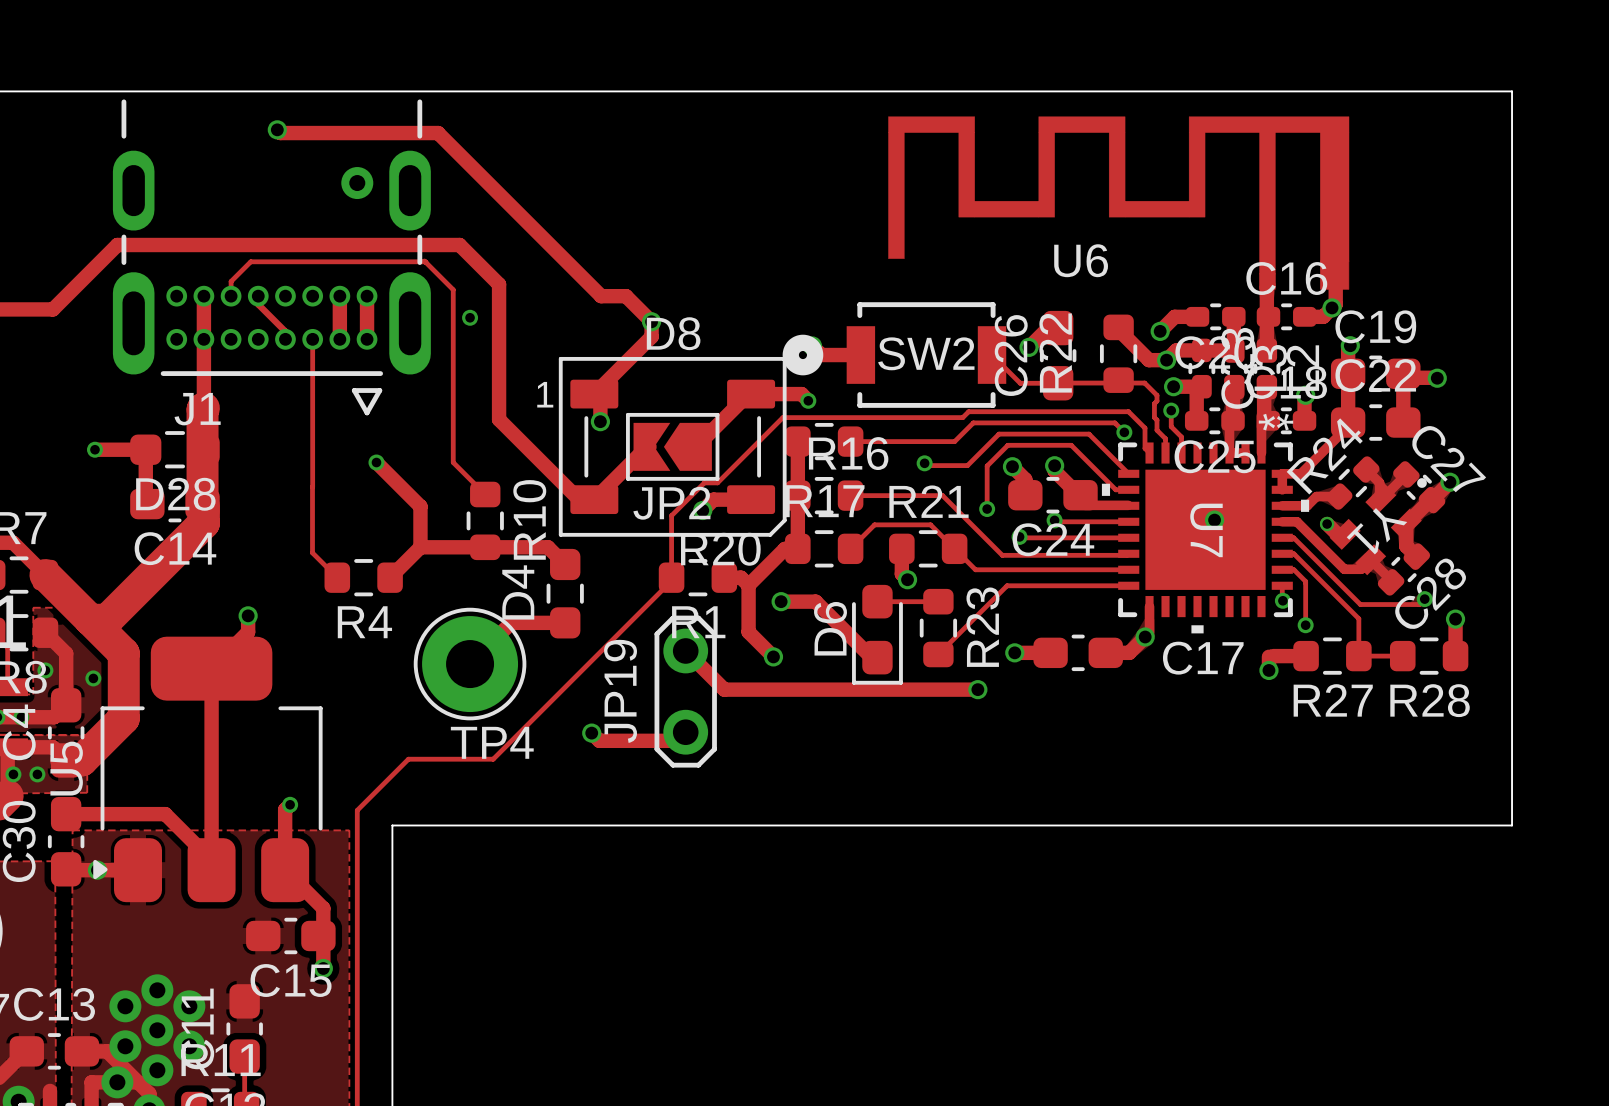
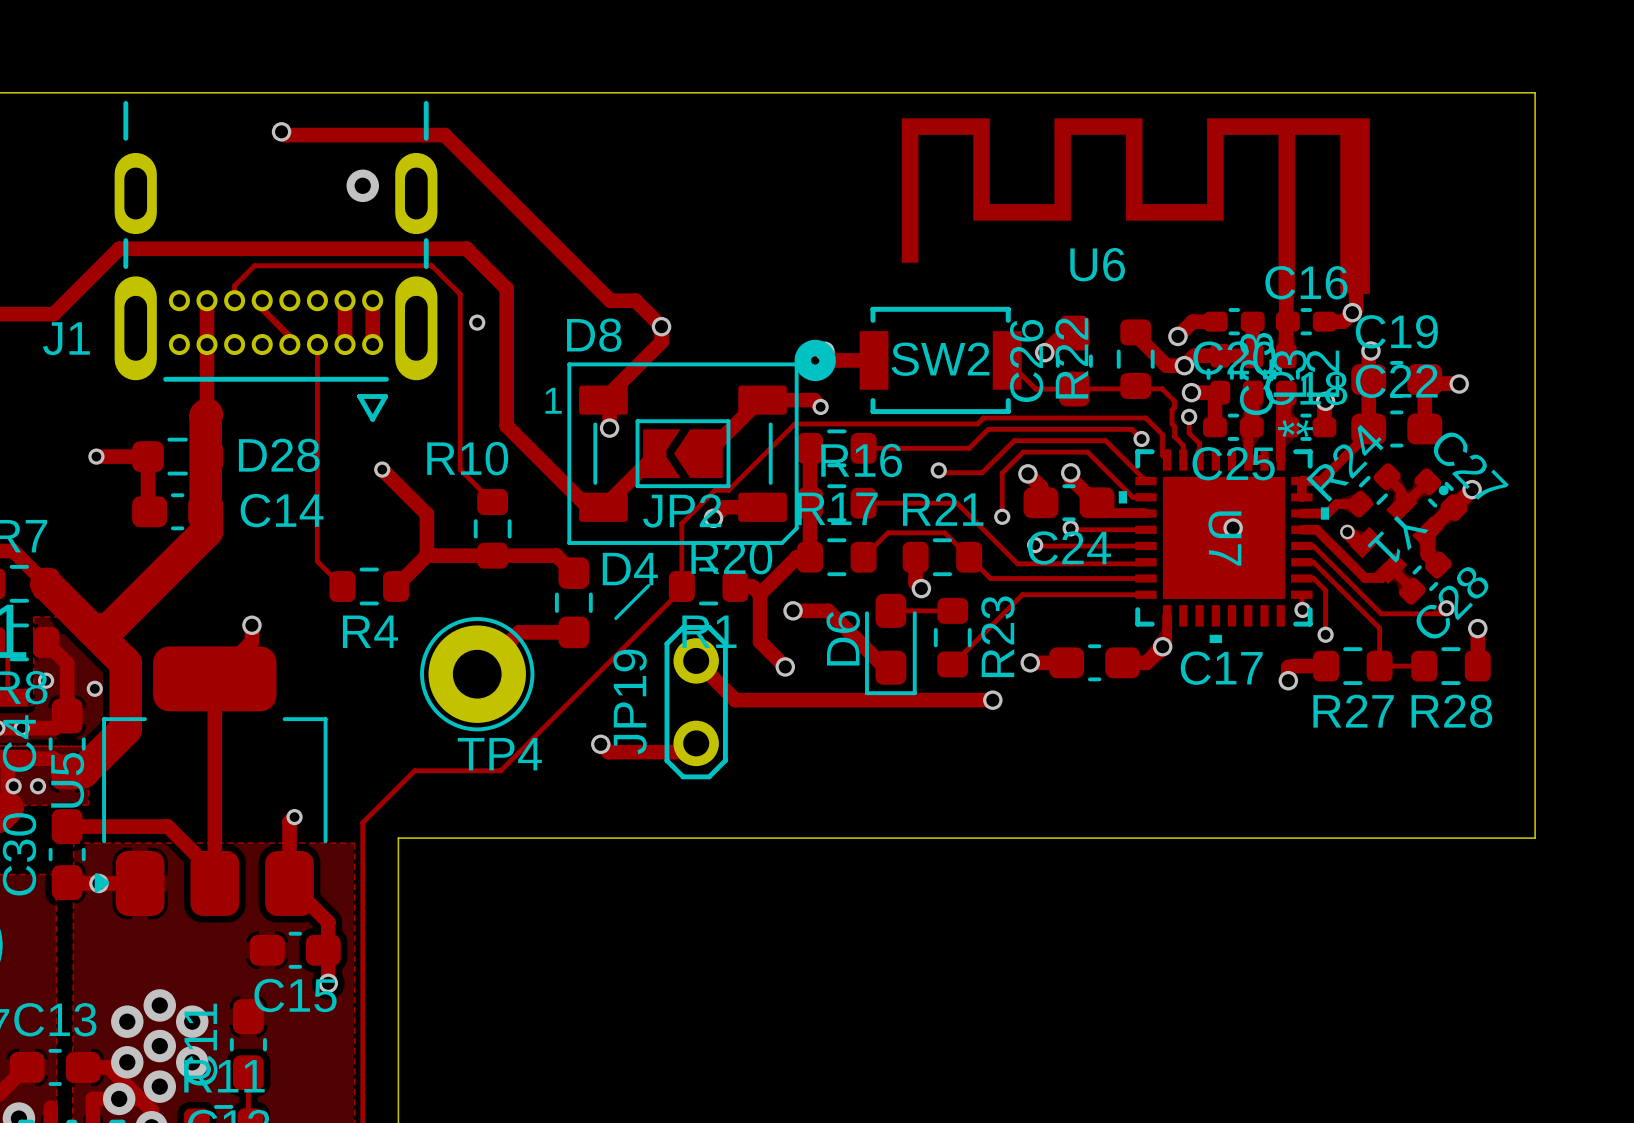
D8 name position: D8 (673, 333) -> D8 (594, 335)
J1 name position: J1 (197, 409) -> J1 (66, 338)
D28 name position: D28 (175, 494) -> D28 (279, 455)
R10 name rotation: 0° (529, 519) -> 90° clockwise (467, 458)
C14 name position: C14 (175, 548) -> C14 (282, 510)
line: none -> (648, 585) (615, 618)
D4 name rotation: 0° (518, 592) -> 90° clockwise (630, 569)
D4 name position: D4 (518, 592) -> D4 (630, 569)

